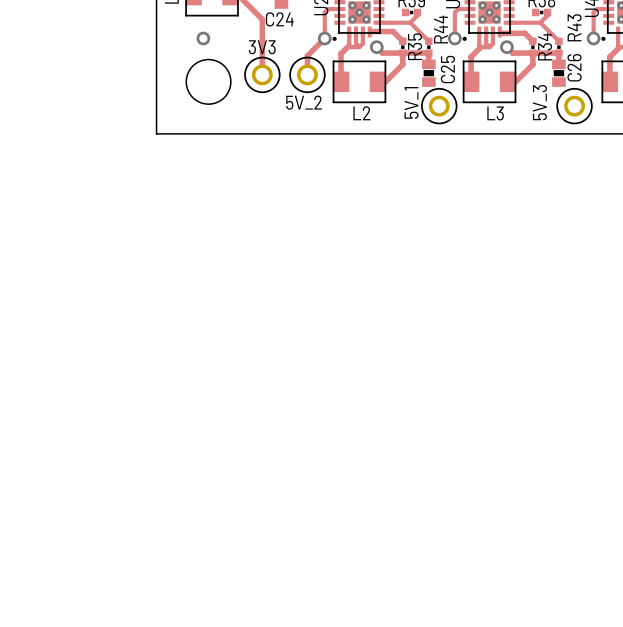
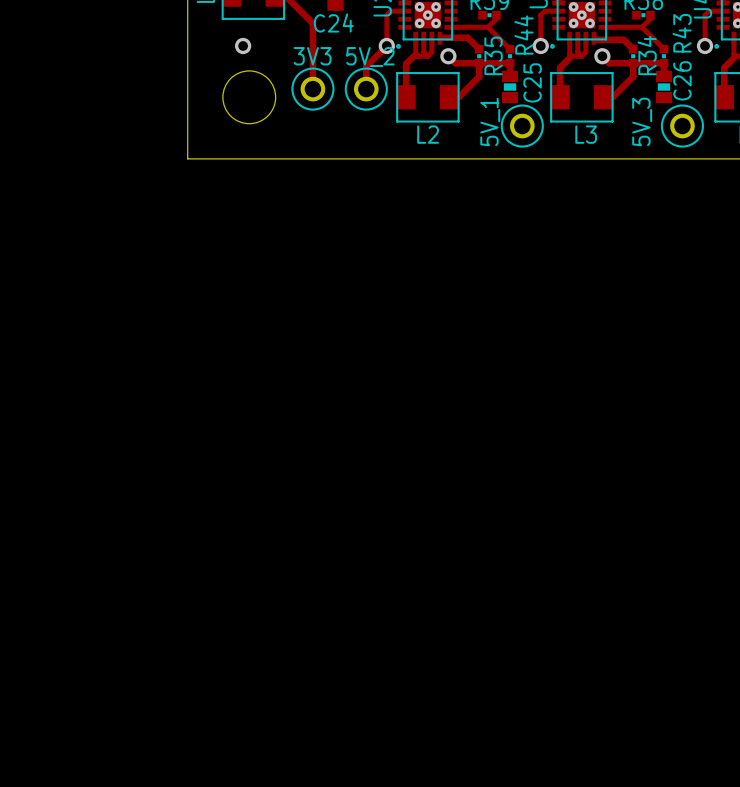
5V_2 name position: 5V_2 (304, 102) -> 5V_2 (370, 57)

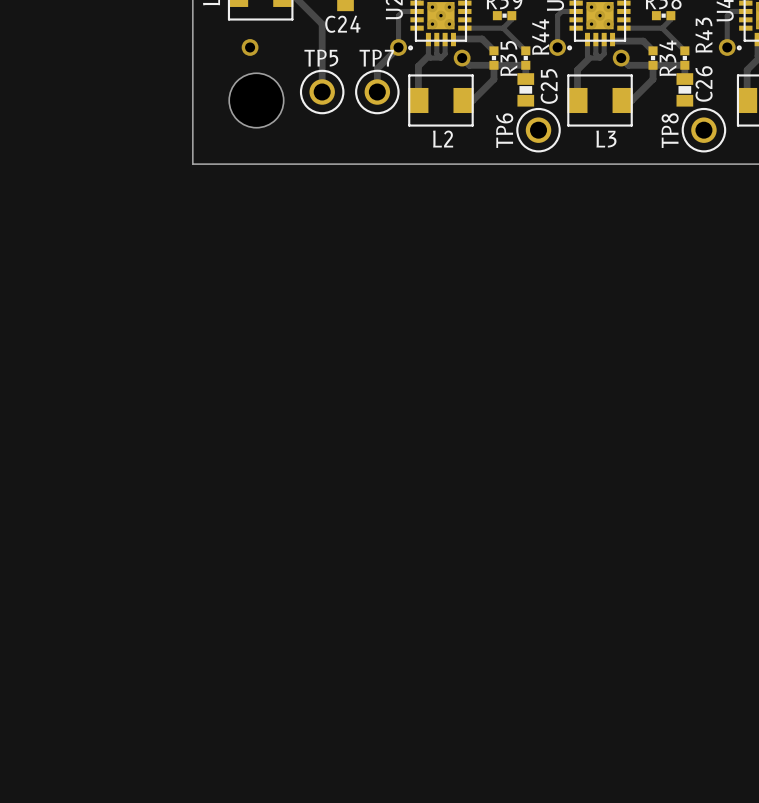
3V3 name: 3V3 (312, 56) -> TP5 (321, 58)
5V_2 name: 5V_2 (370, 57) -> TP7 (376, 58)
5V_1 name: 5V_1 (490, 121) -> TP6 (504, 130)
5V_3 name: 5V_3 (642, 121) -> TP8 (670, 130)

